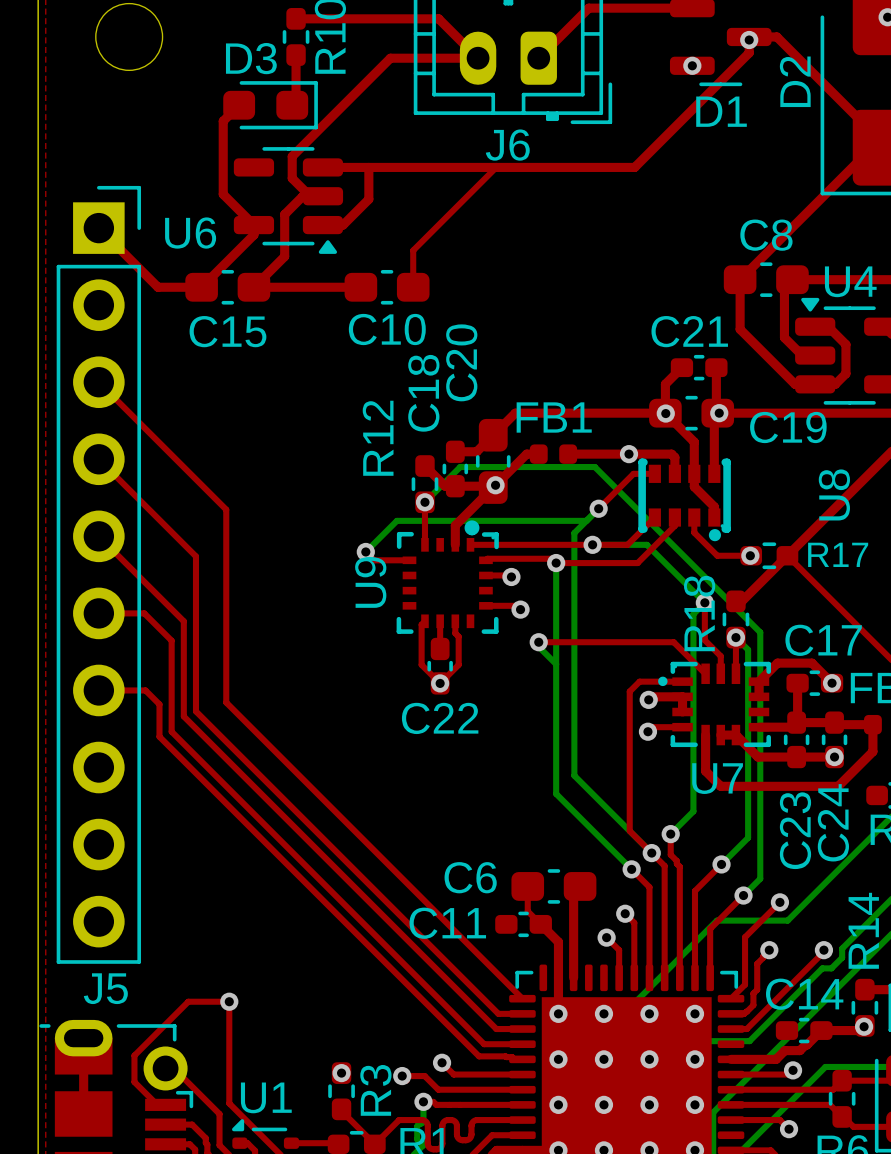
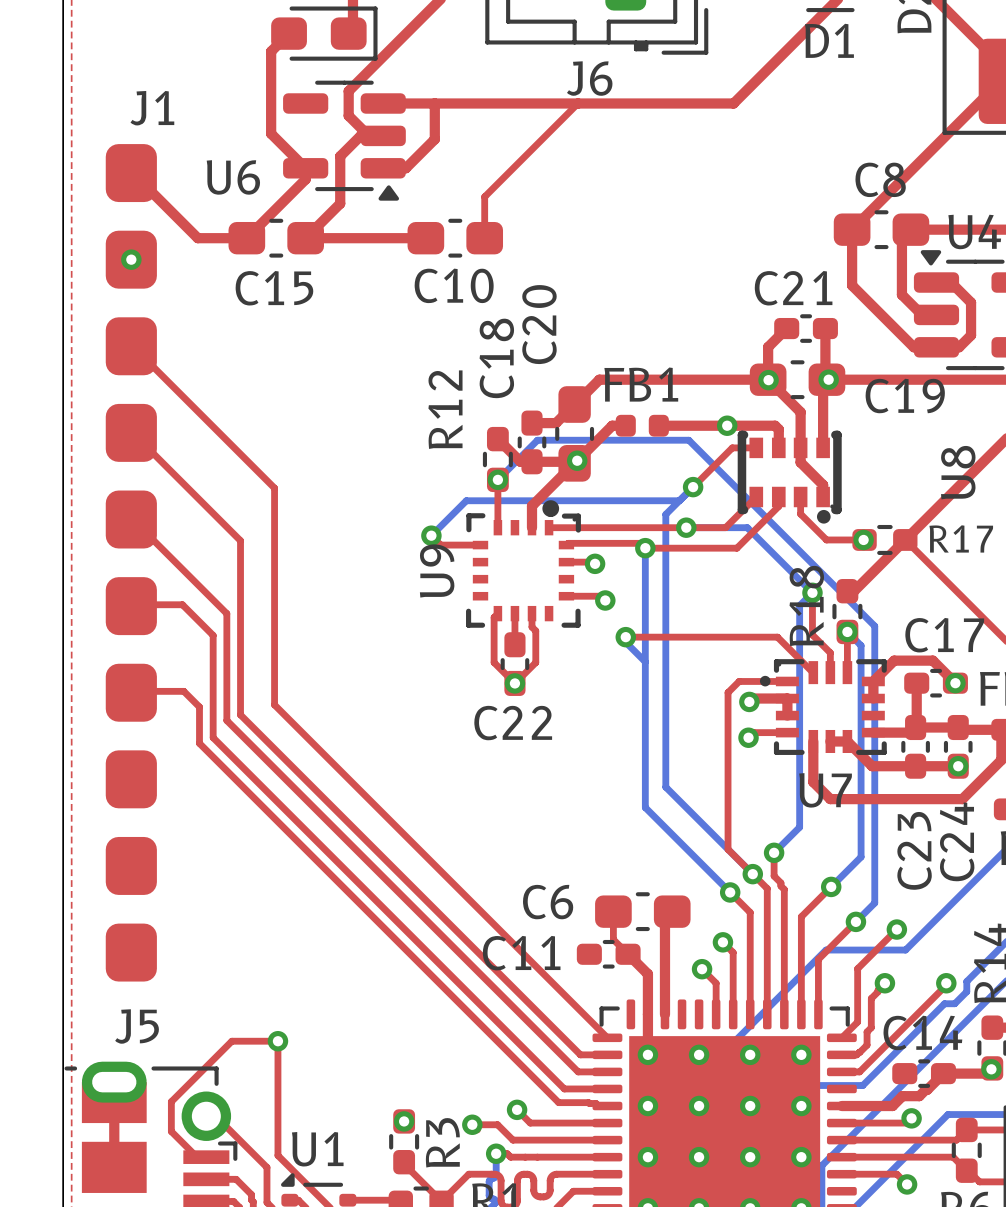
via: none -> (131, 259)
part: (98, 574) -> none
J1: none -> (131, 562)

